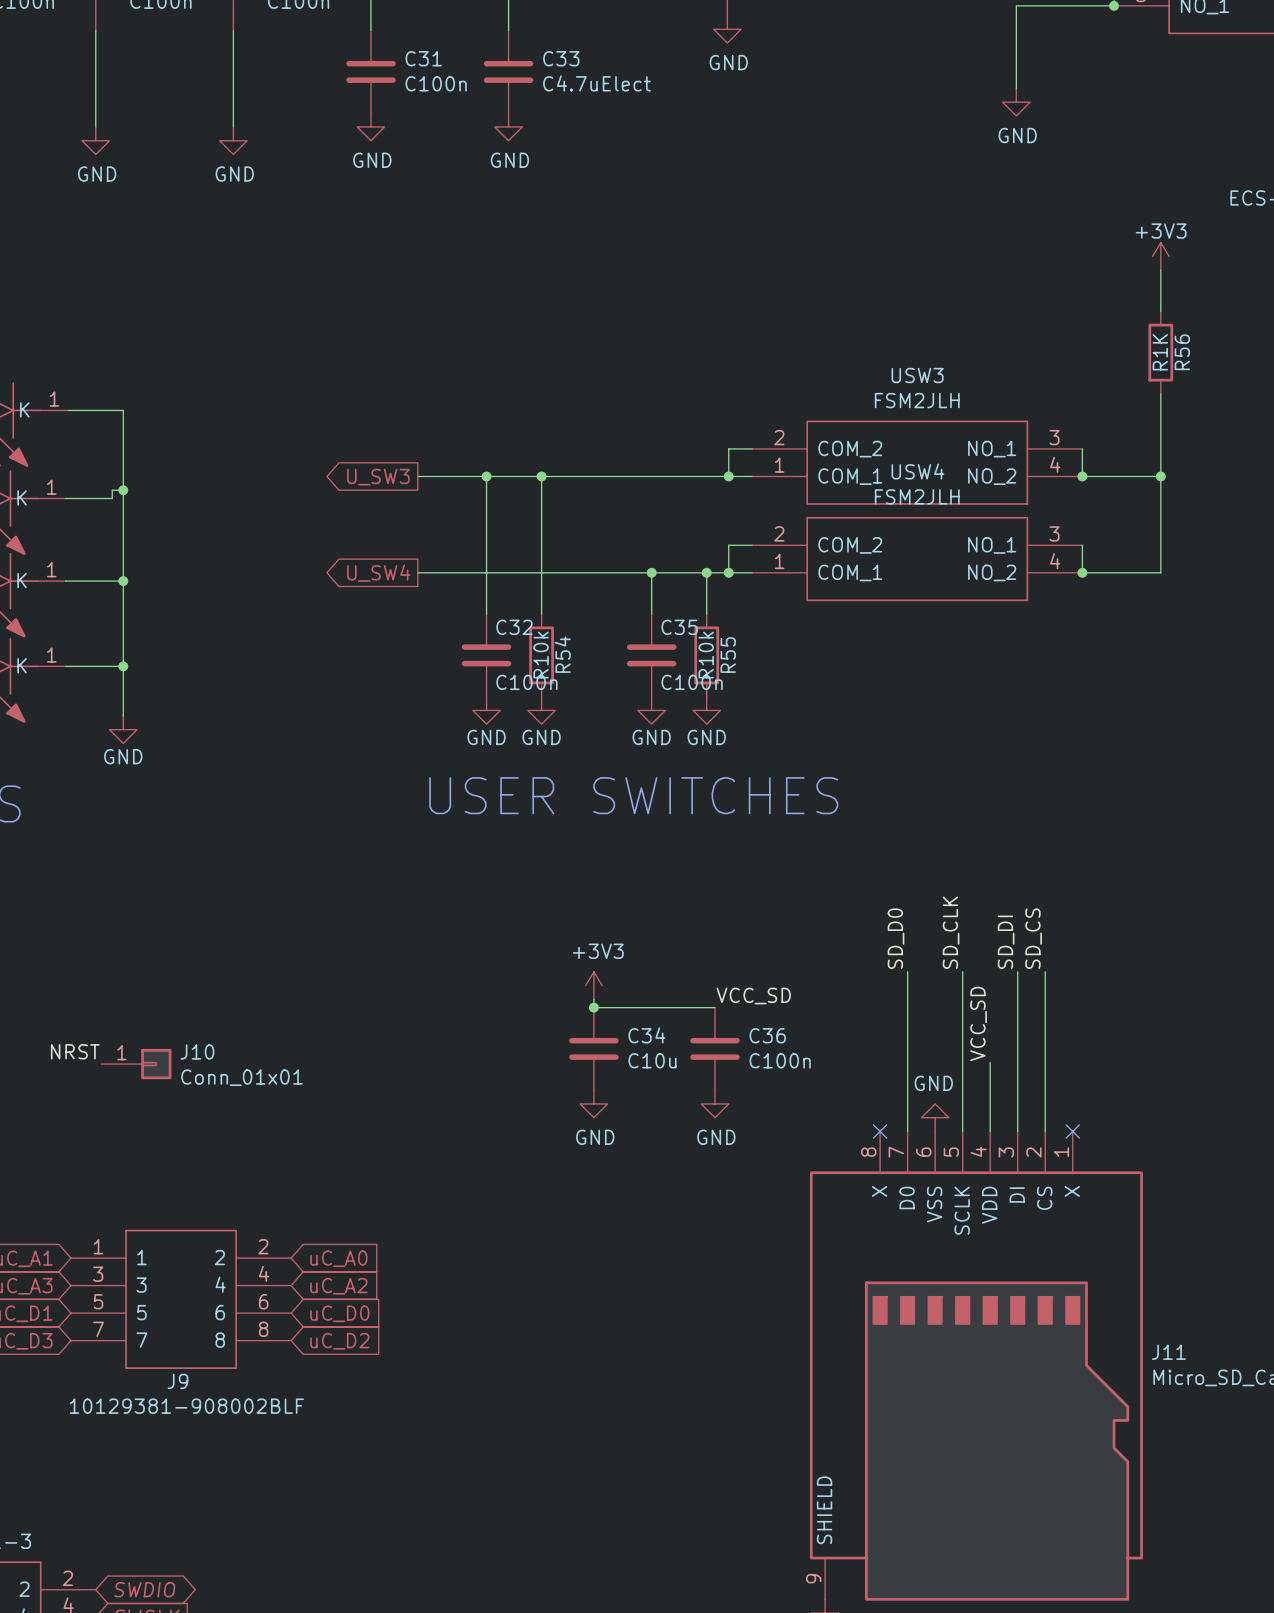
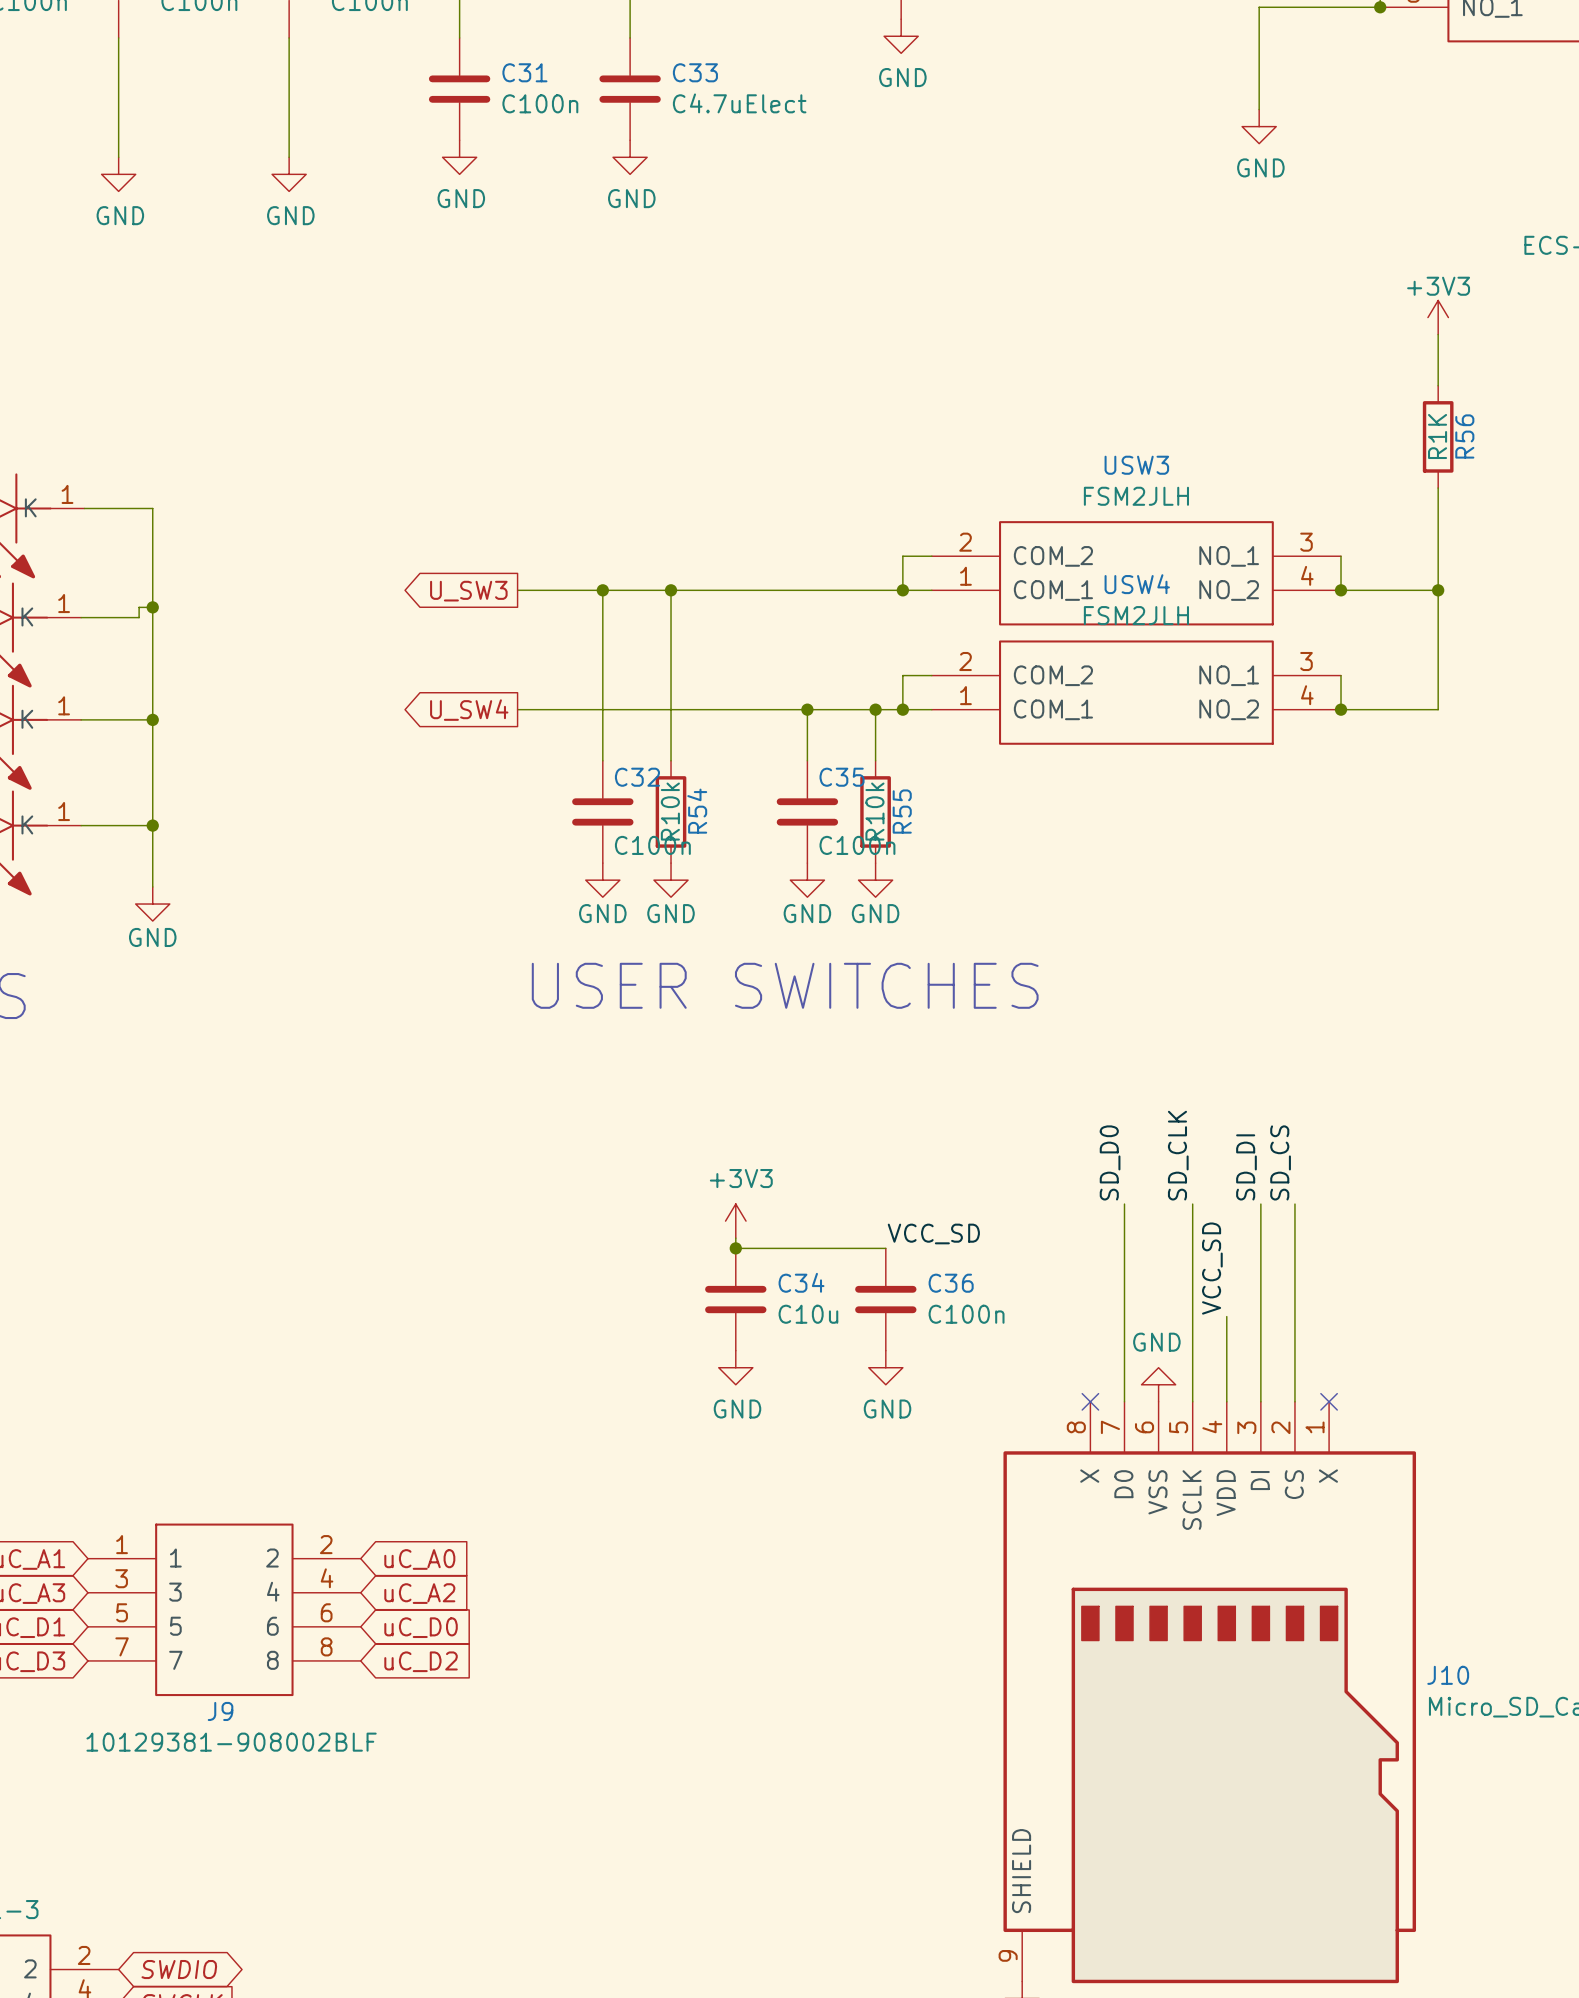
label: NRST (75, 1051) -> none
J10: Conn_01x01 (136, 1064) -> none
J11 name: J11 (1168, 1352) -> J10 (1448, 1675)

